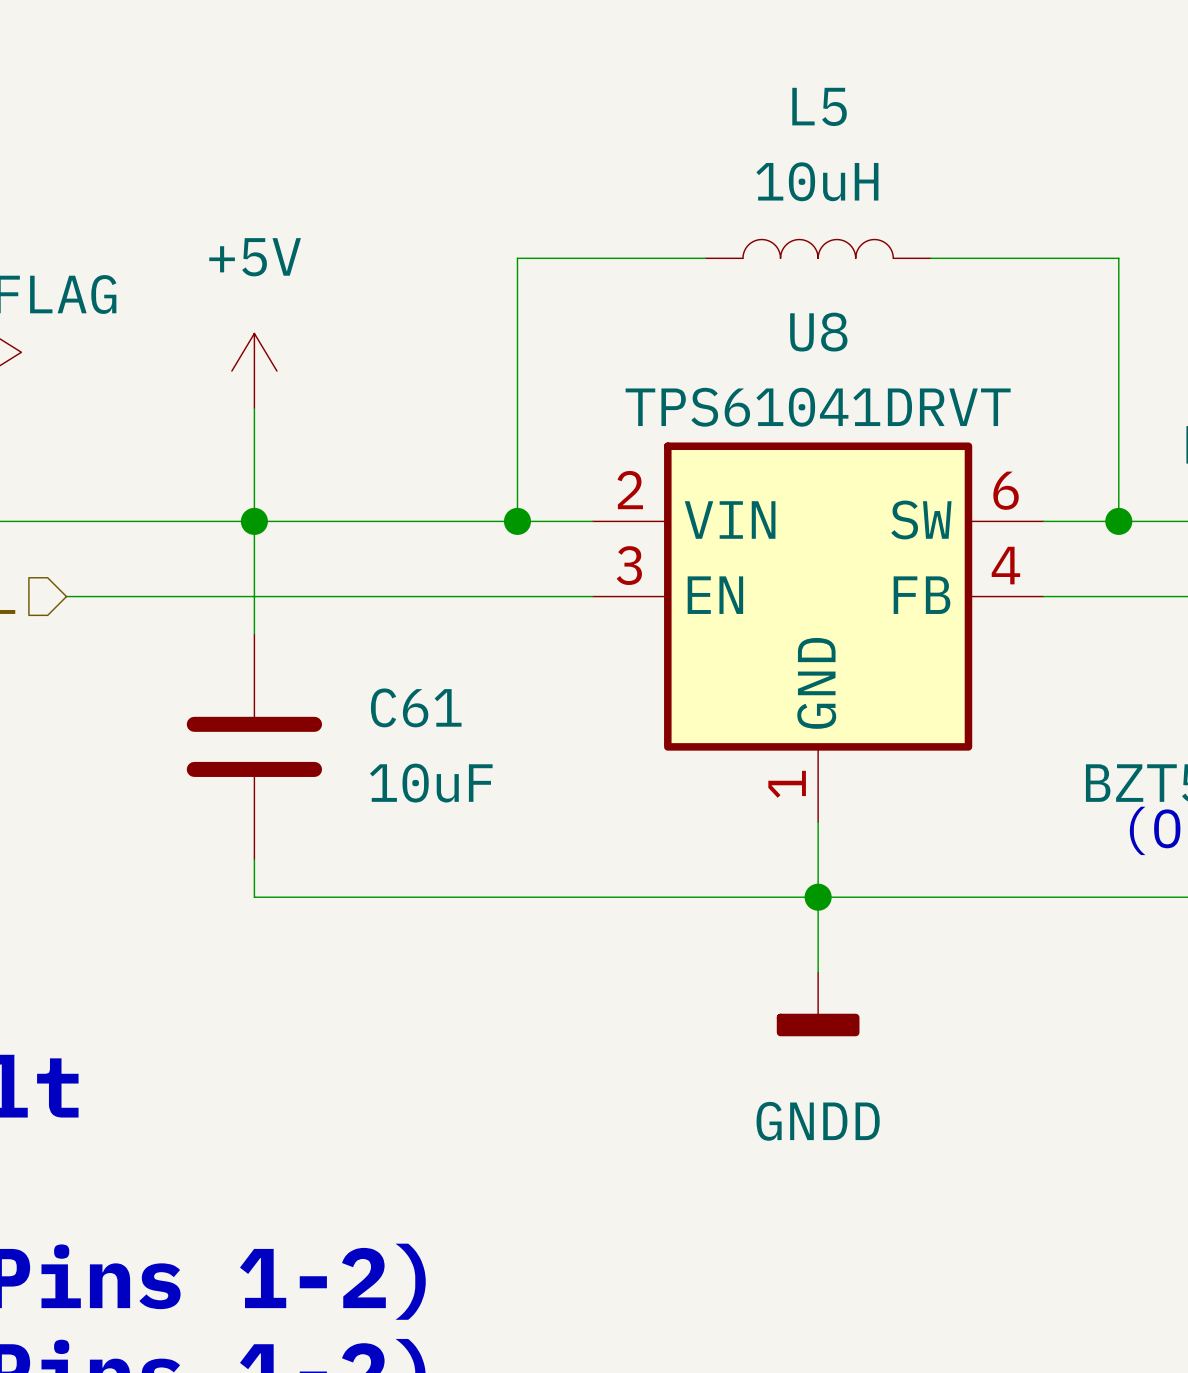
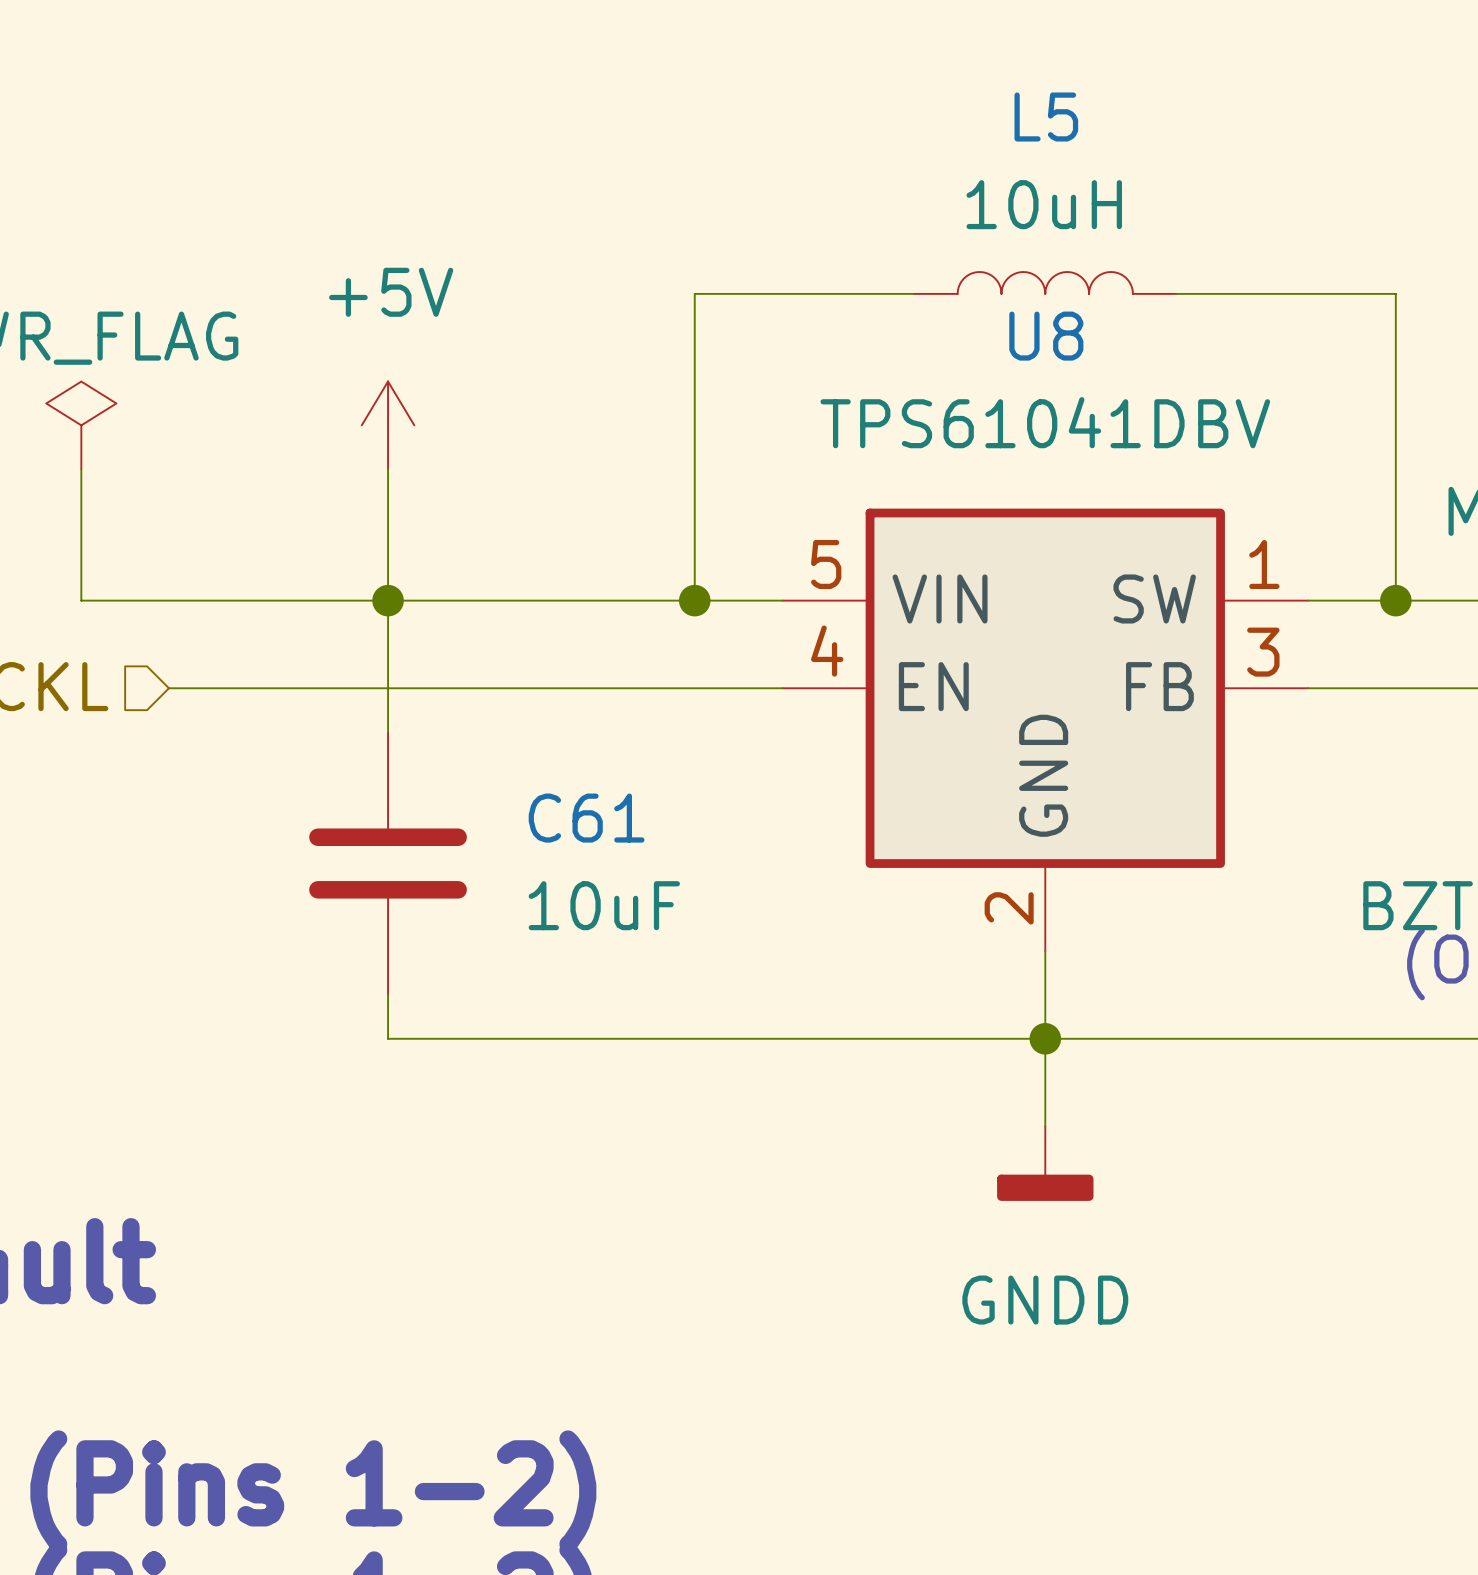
U8 name position: U8 (818, 332) -> U8 (1046, 336)
U8 value: TPS61041DRVT (818, 407) -> TPS61041DBV (1045, 422)
U8 pin number: 2 (630, 490) -> 5 (826, 564)
U8 pin number: 6 (1006, 490) -> 1 (1264, 564)
U8 pin number: 3 (629, 565) -> 4 (827, 651)
U8 pin number: 4 (1005, 565) -> 3 (1263, 652)
U8 pin number: 1 (787, 784) -> 2 (1009, 908)

